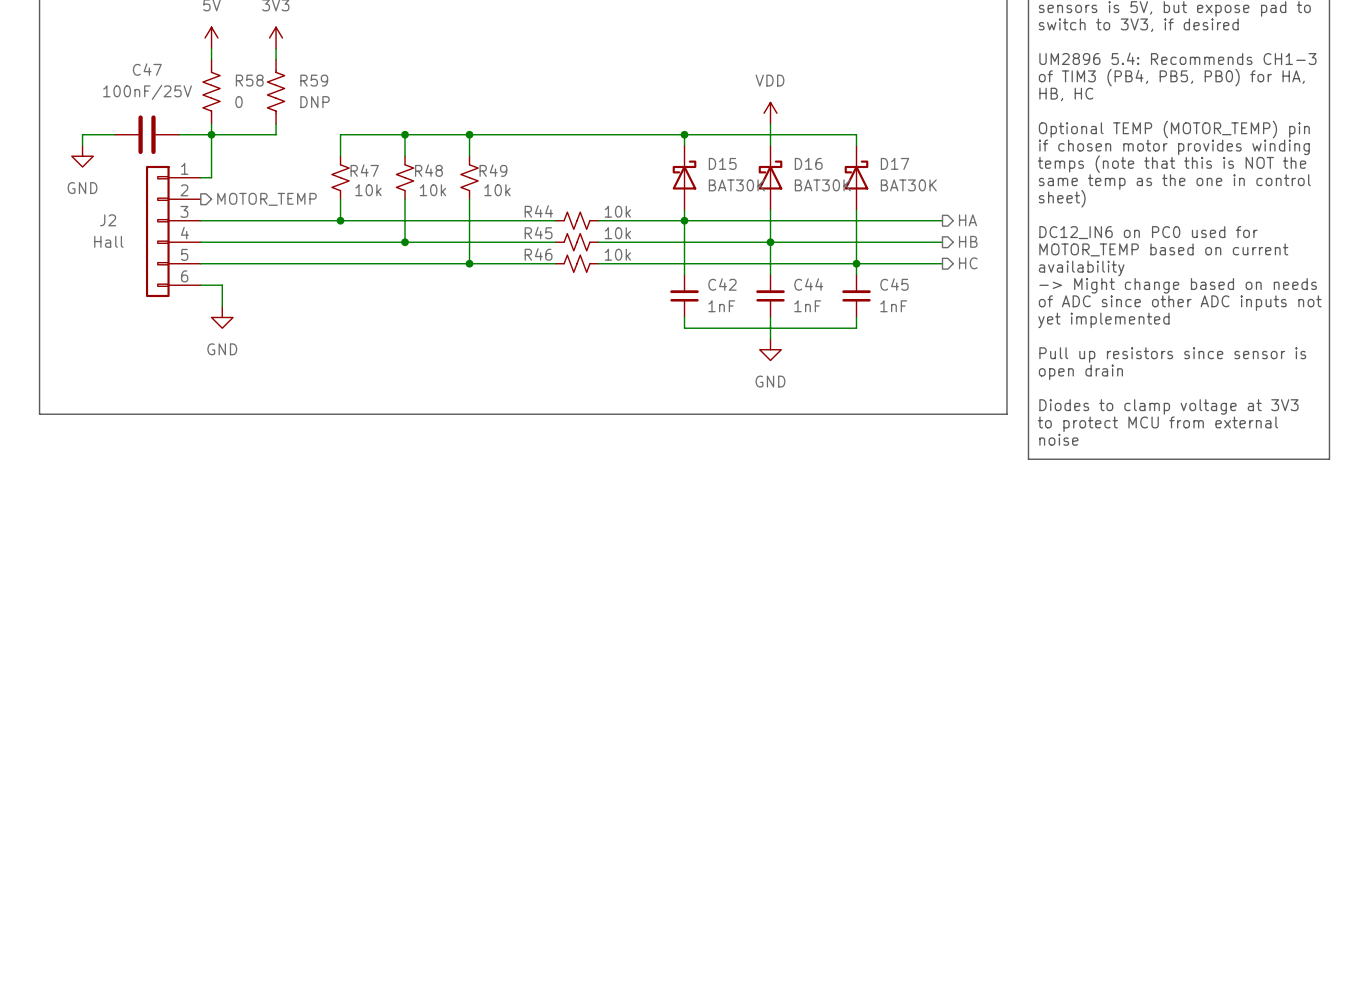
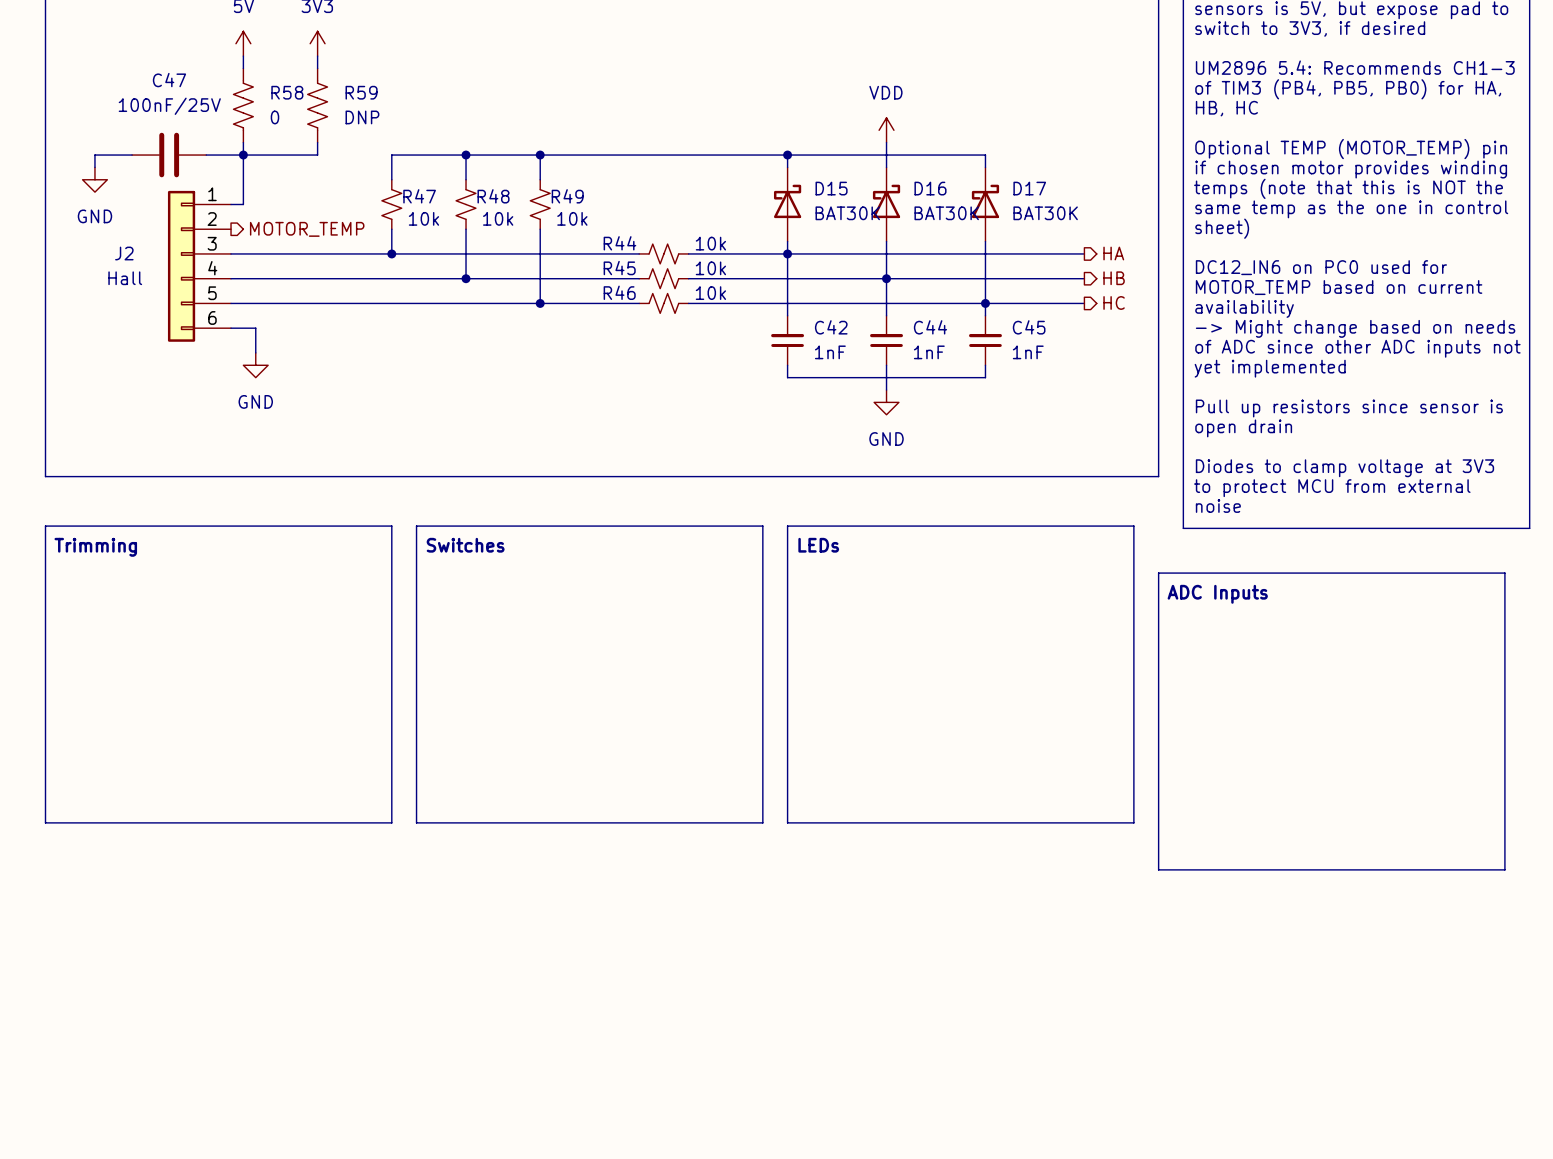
line: none -> (45, 526) (391, 526) (391, 822) (45, 822) (45, 526)
line: none -> (416, 526) (762, 526) (762, 822) (416, 822) (416, 526)
line: none -> (787, 526) (1133, 526) (1133, 822) (787, 822) (787, 526)
text: none -> Switches (465, 545)
text: none -> LEDs (818, 545)
text: none -> Trimming (95, 547)
line: none -> (1158, 573) (1504, 573) (1504, 869) (1158, 869) (1158, 573)
text: none -> ADC Inputs (1217, 594)

